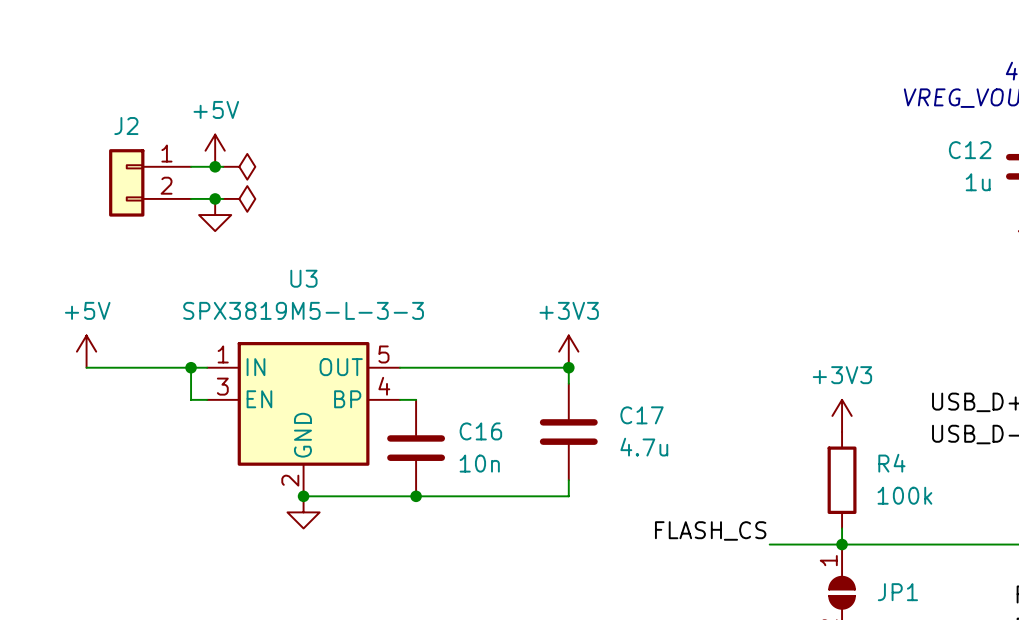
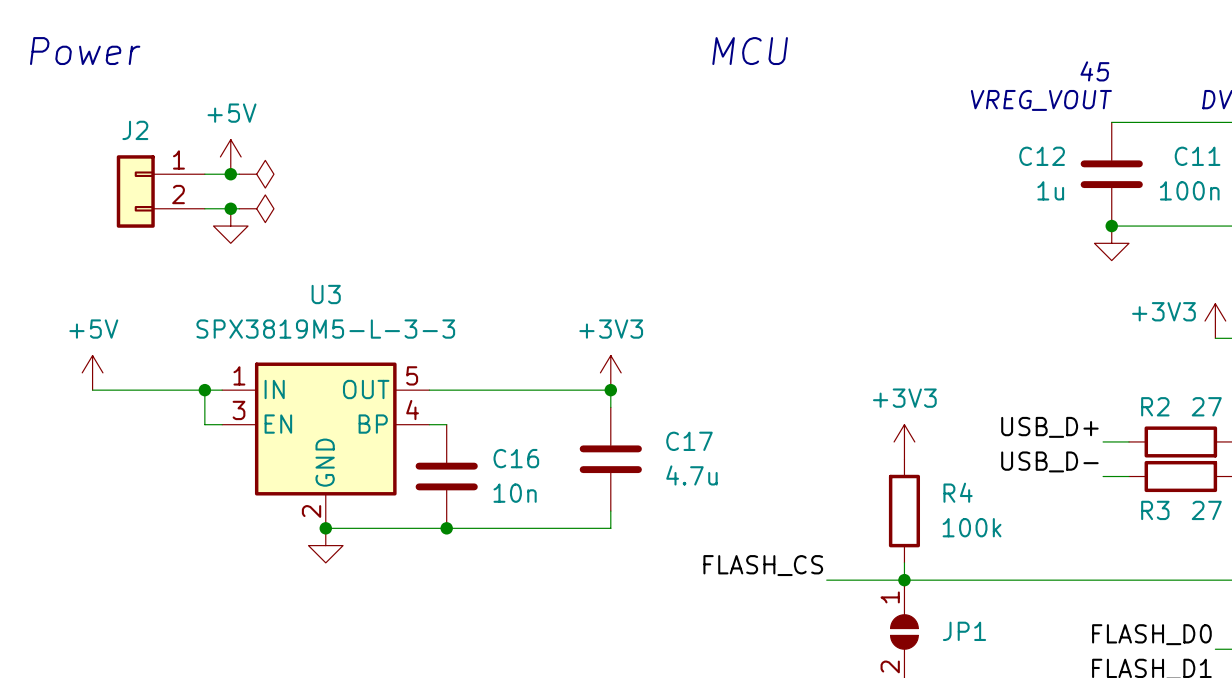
text: none -> Power (85, 51)
text: none -> MCU (750, 51)

